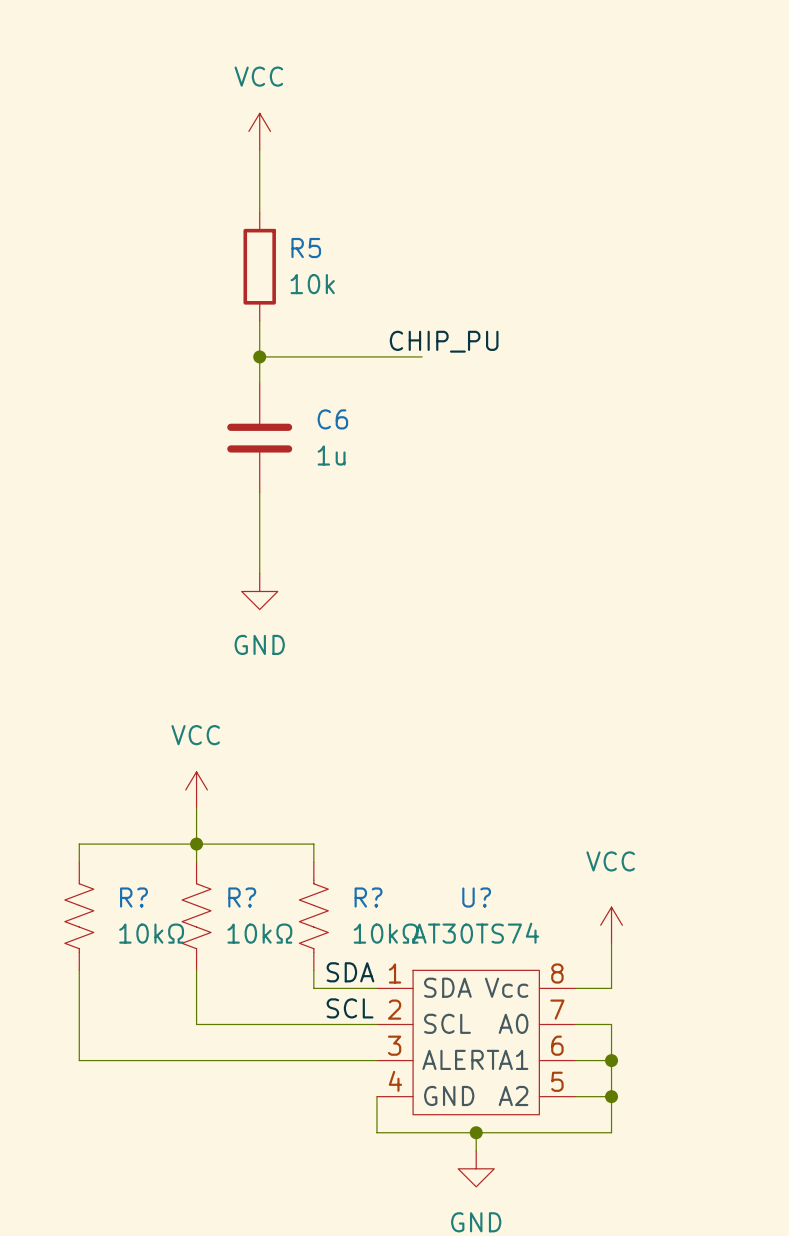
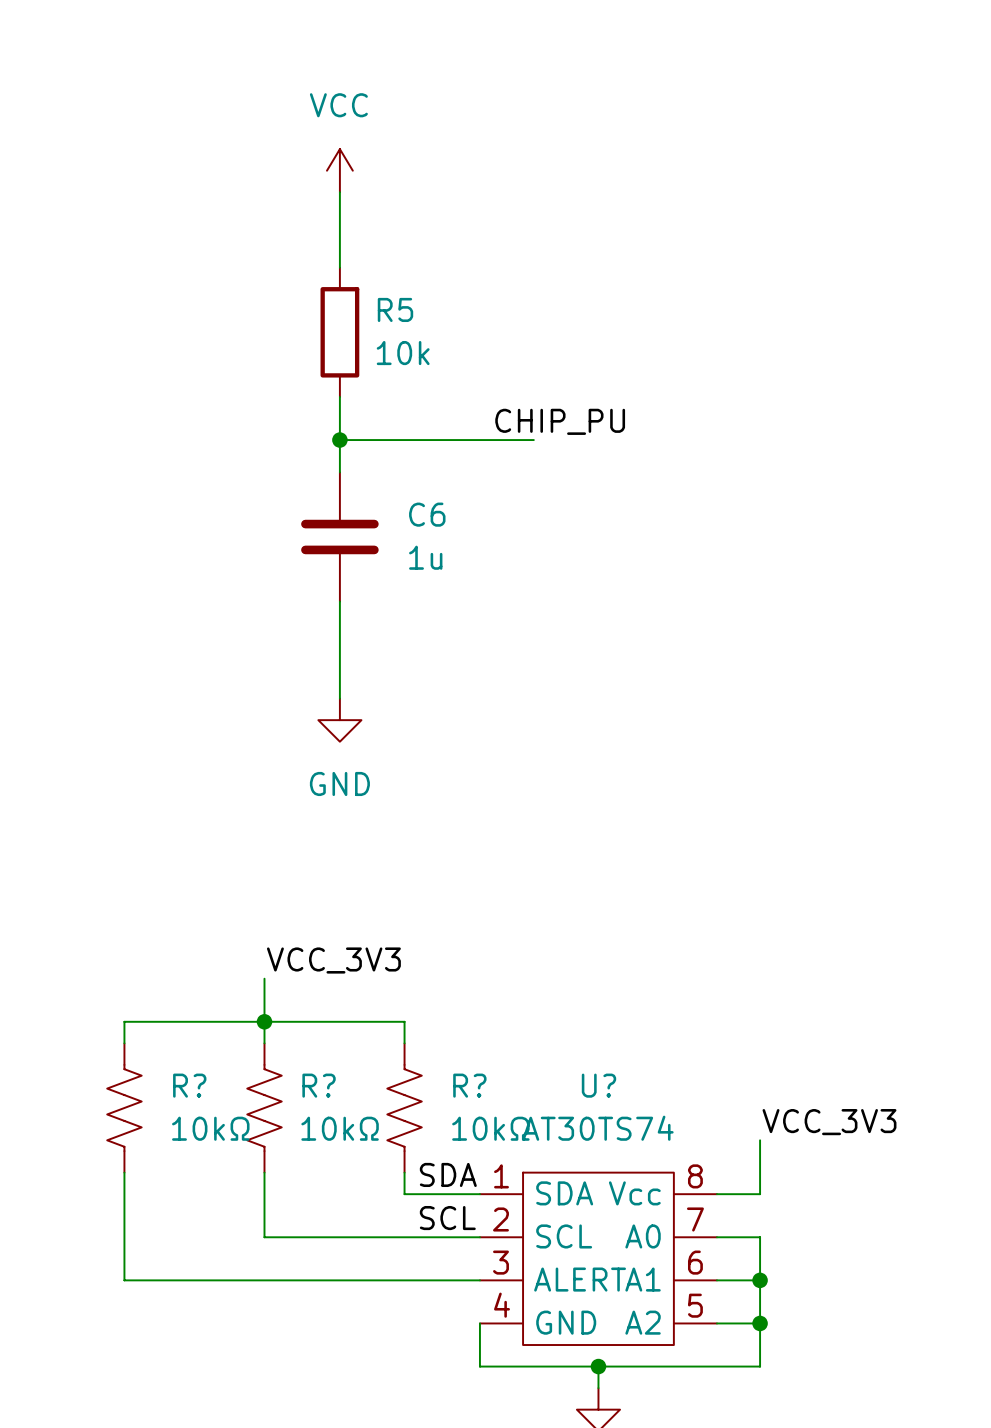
power symbol: VCC (196, 789) -> none
label: none -> VCC_3V3 (333, 960)
power symbol: VCC (611, 925) -> none
label: none -> VCC_3V3 (829, 1122)

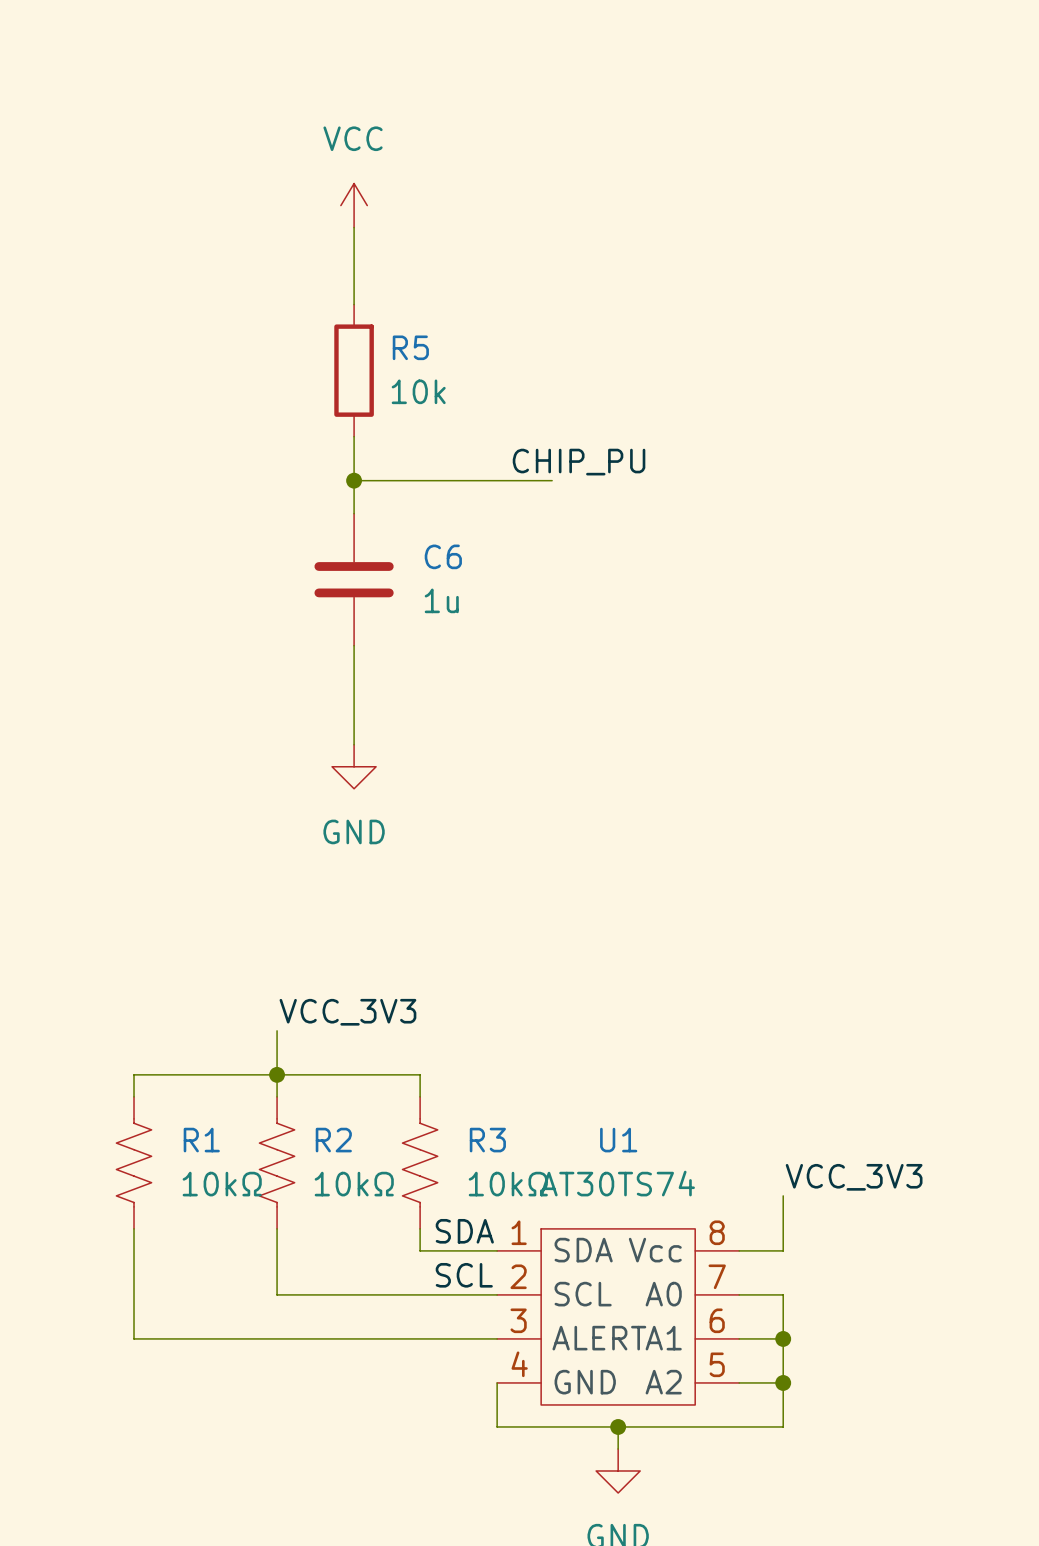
R? name: R? (189, 1085) -> R1 (201, 1140)
R? name: R? (319, 1085) -> R2 (333, 1140)
R? name: R? (469, 1085) -> R3 (487, 1140)
U? name: U? (598, 1085) -> U1 (618, 1140)

